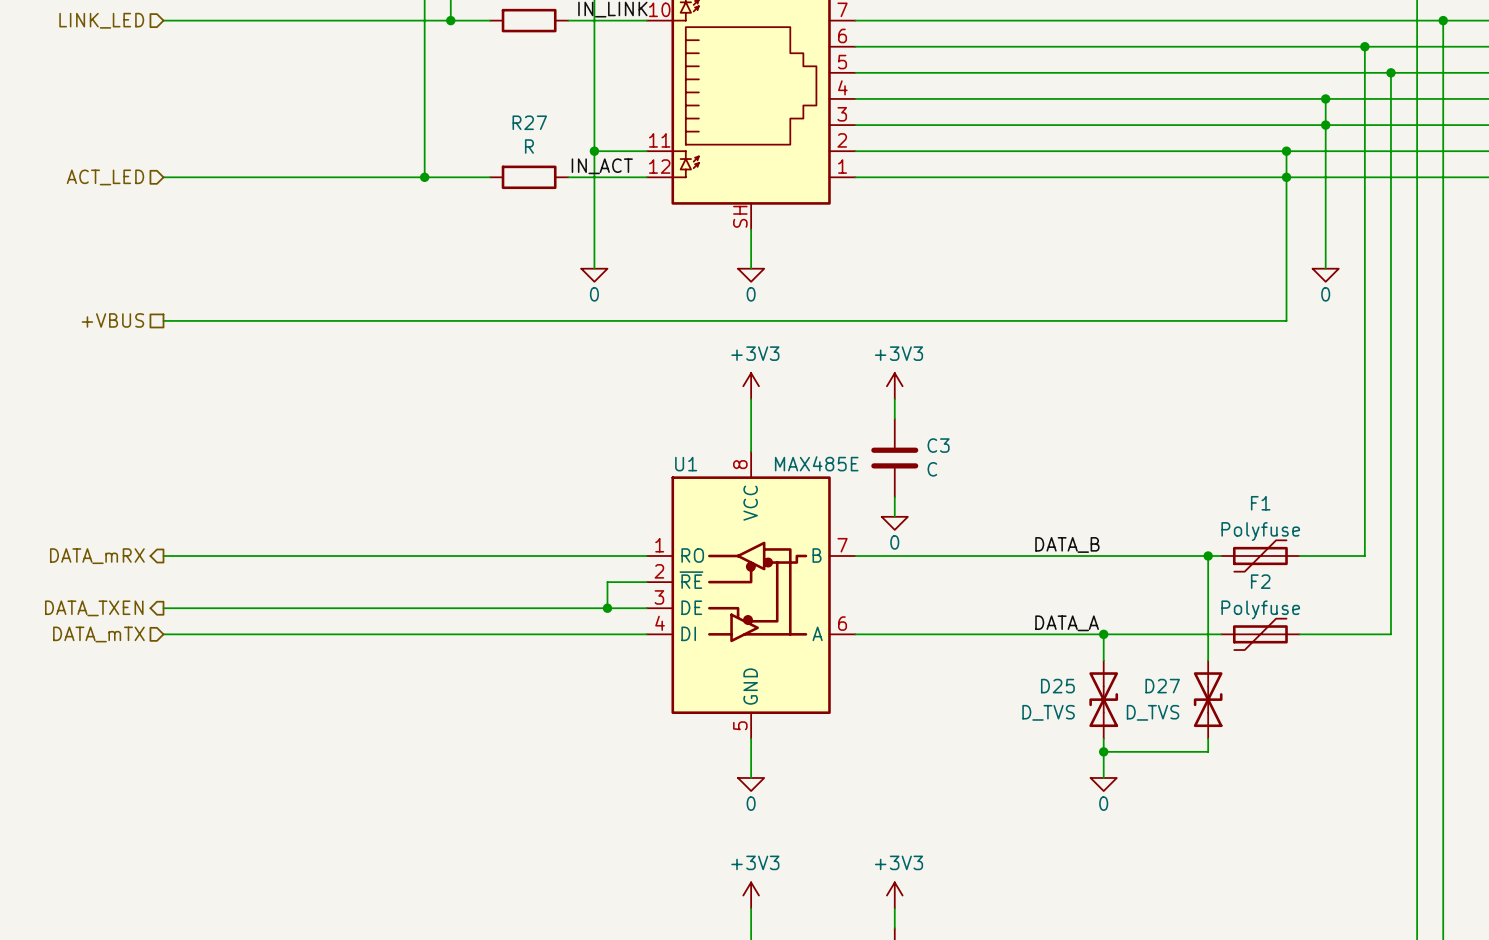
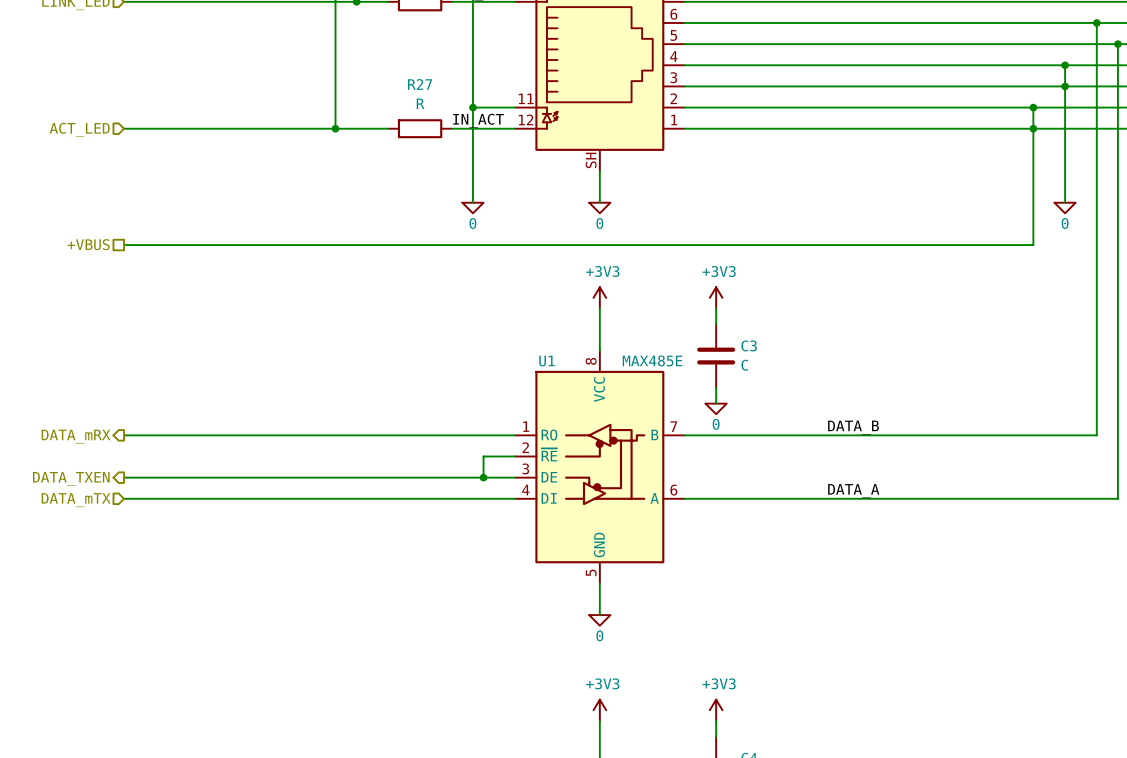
wire: (1208, 556) (1208, 660) -> none
junction: (1208, 556) -> none
F1: Polyfuse (1260, 556) -> none
wire: (1103, 634) (1103, 660) -> none
junction: (1103, 634) -> none
F2: Polyfuse (1260, 634) -> none
D25: D_TVS (1103, 699) -> none
D27: D_TVS (1208, 699) -> none
wire: (1103, 738) (1103, 777) -> none
wire: (1208, 738) (1208, 751) (1103, 751) -> none
junction: (1103, 751) -> none
power symbol: 0 (1103, 784) -> none

